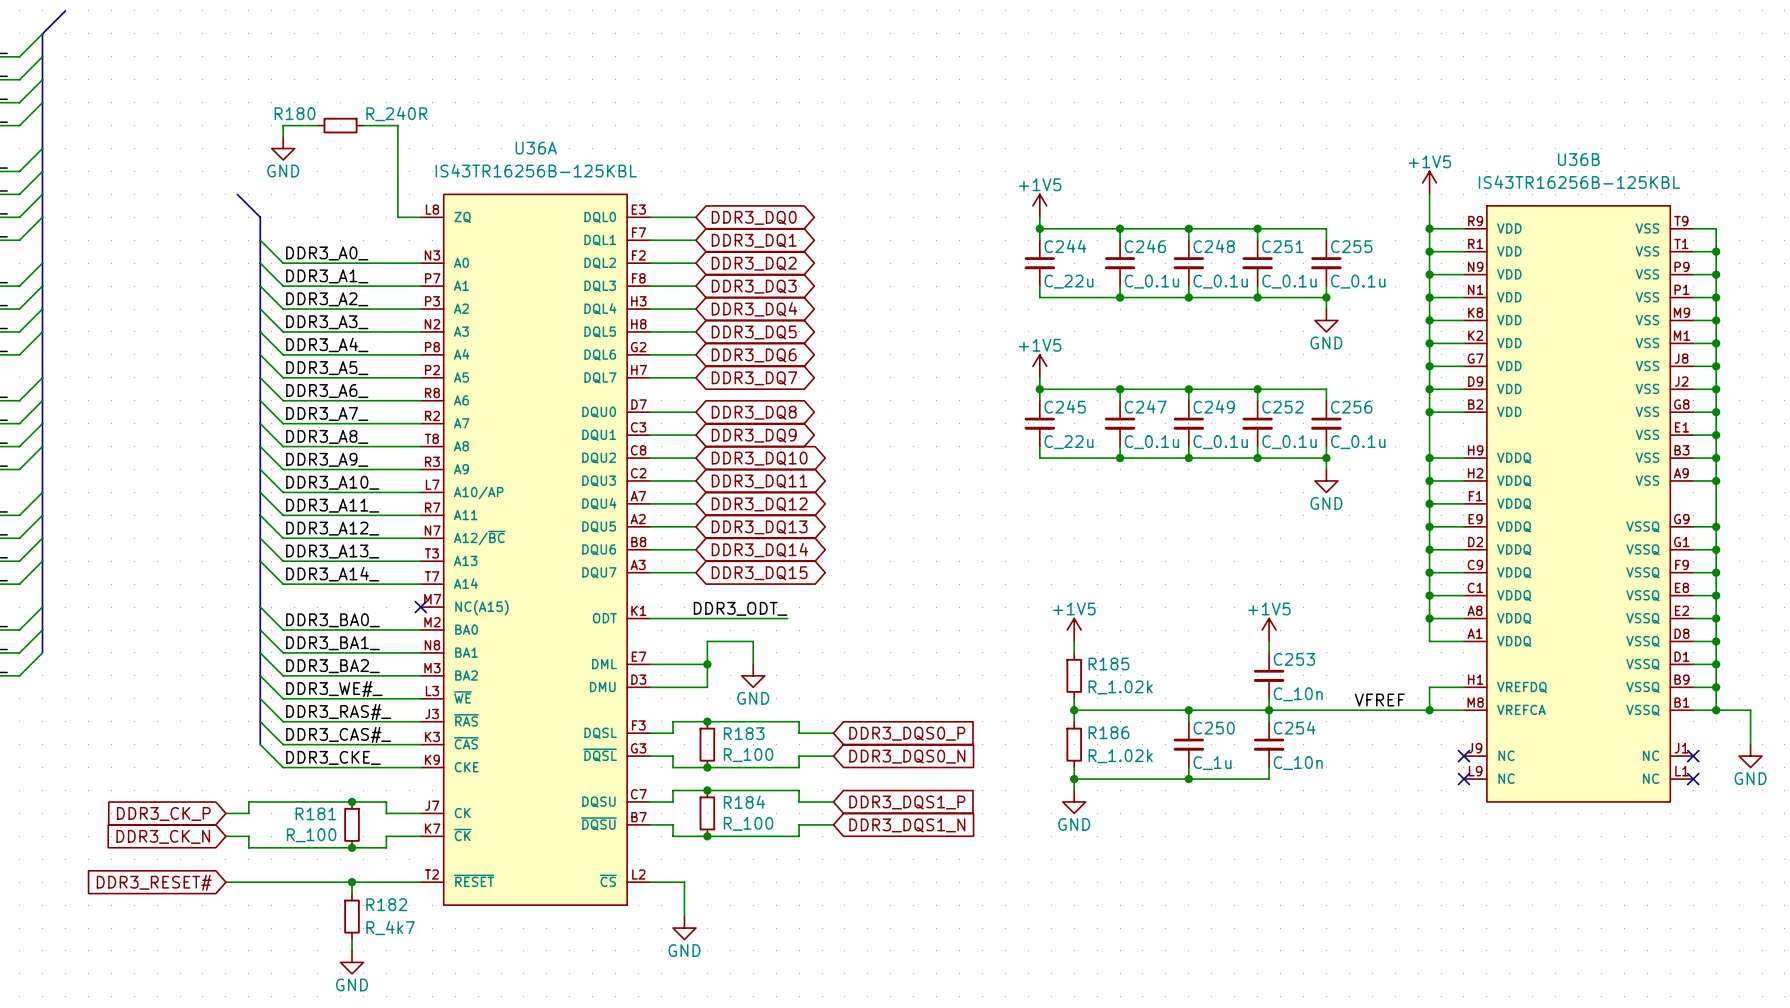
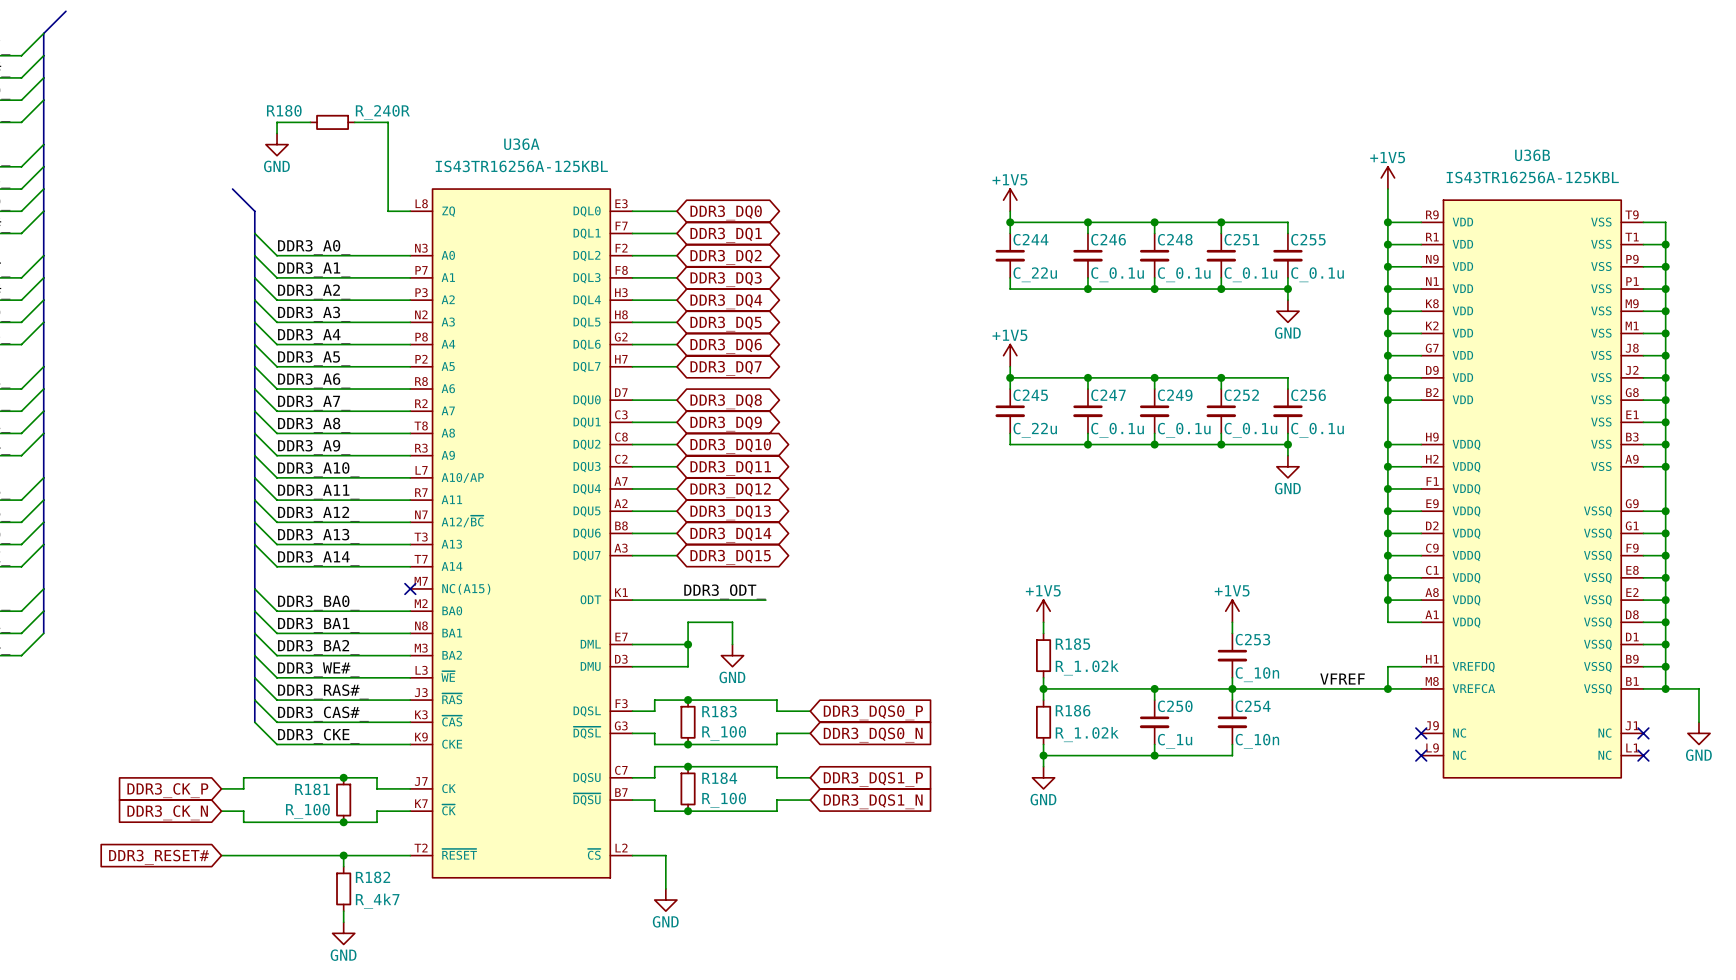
U36A value: IS43TR16256B-125KBL (536, 170) -> IS43TR16256A-125KBL (521, 166)
U36B value: IS43TR16256B-125KBL (1579, 182) -> IS43TR16256A-125KBL (1532, 177)

